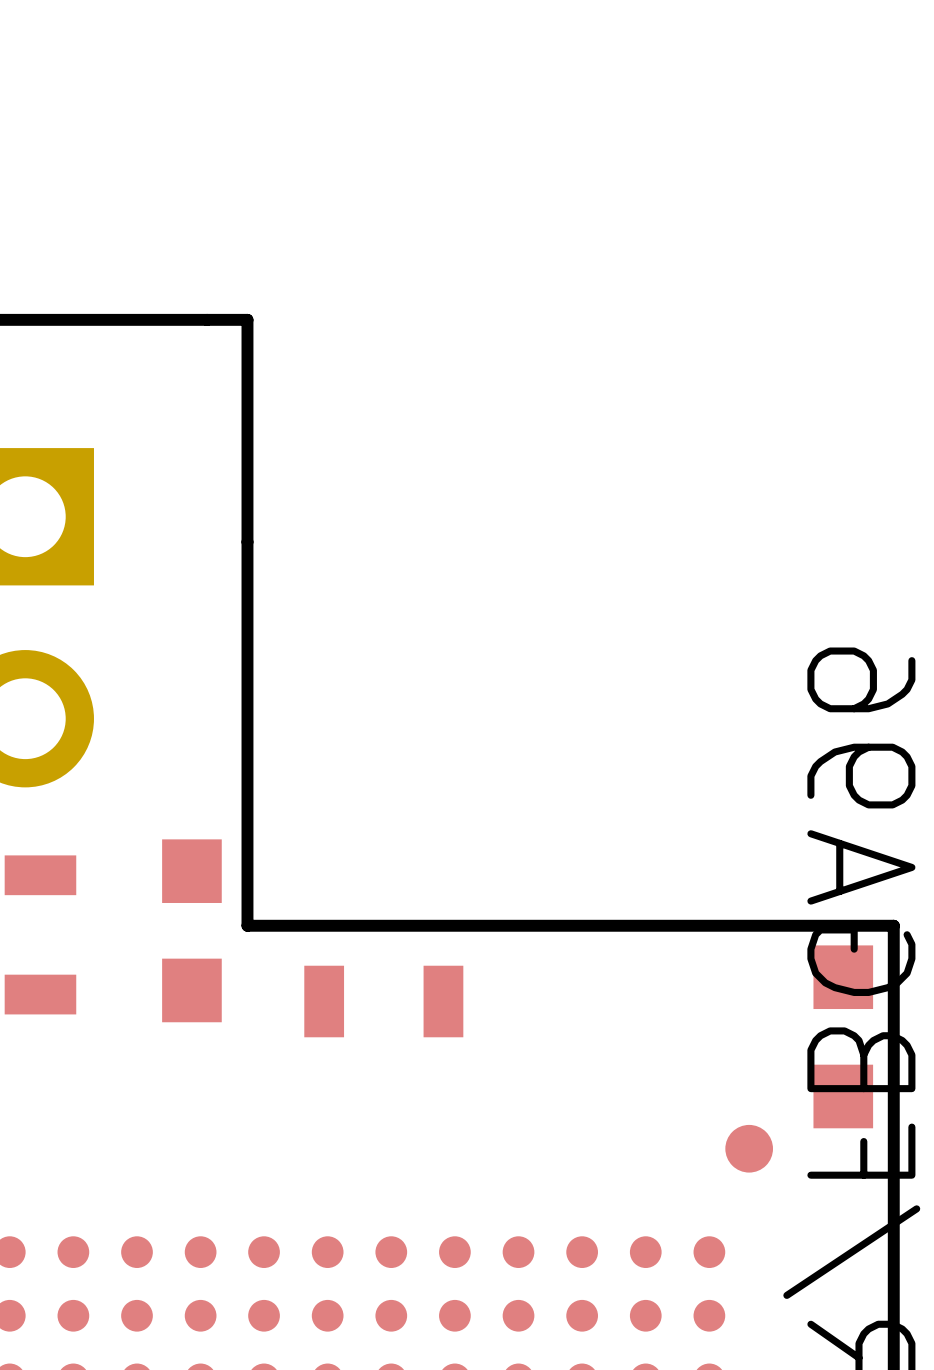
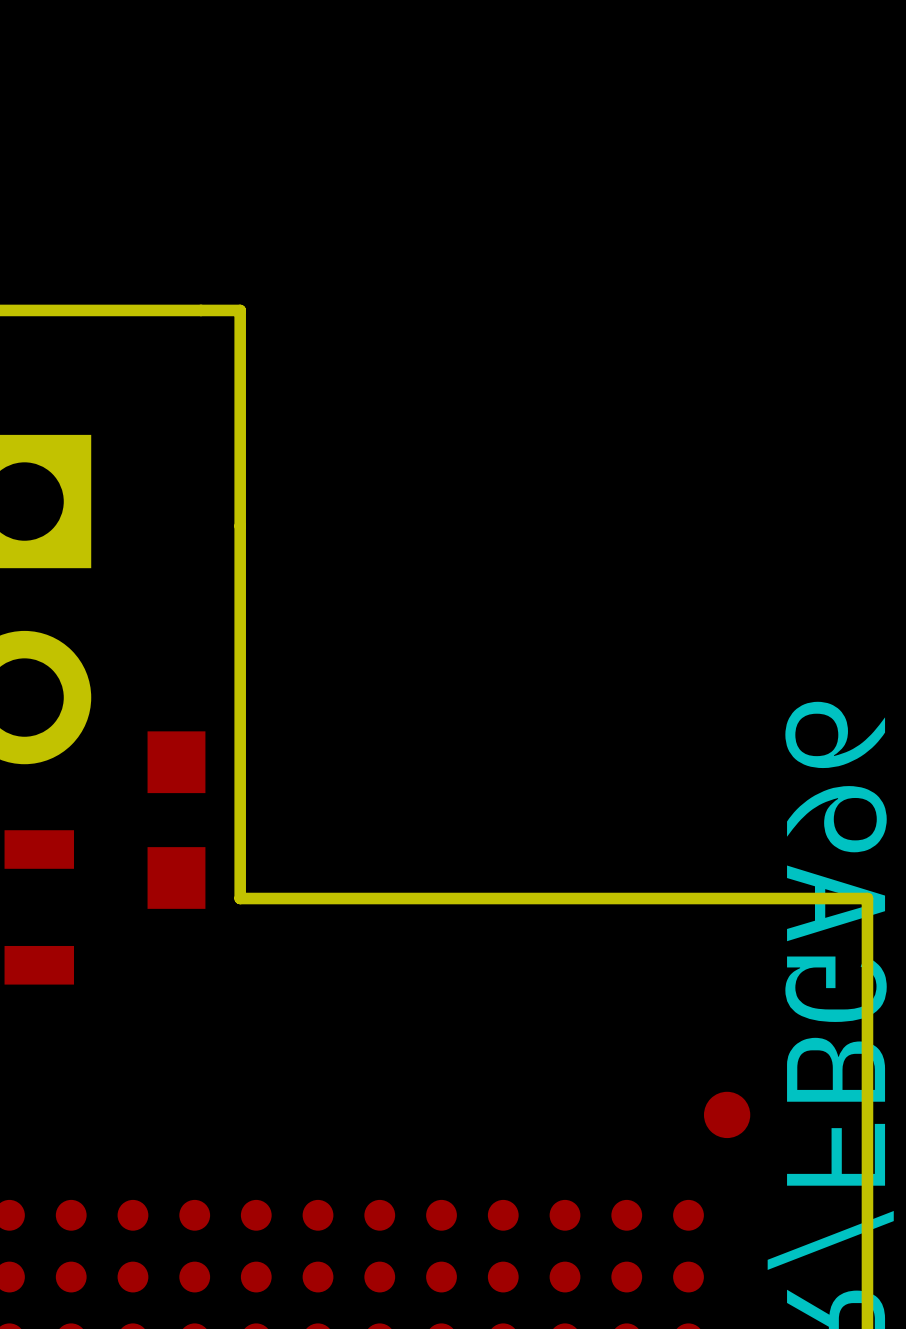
part position: (191, 930) -> (176, 820)
part: (383, 1001) -> none
part: (843, 1036) -> none

